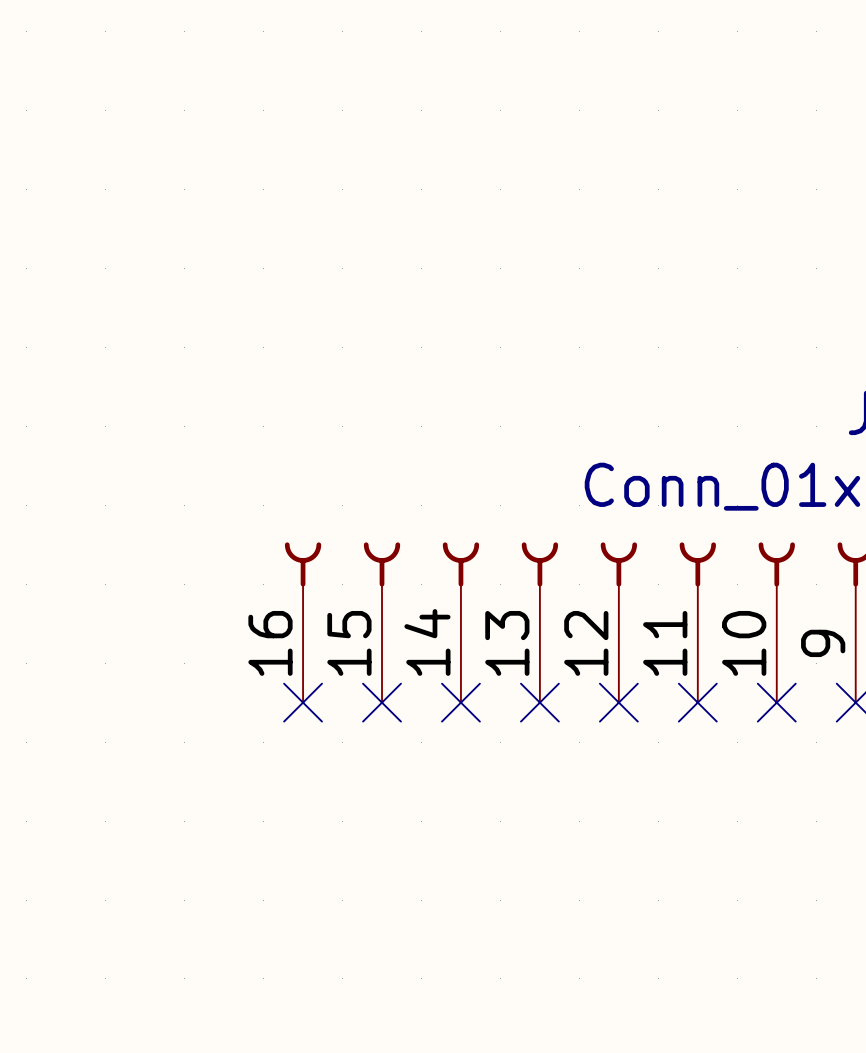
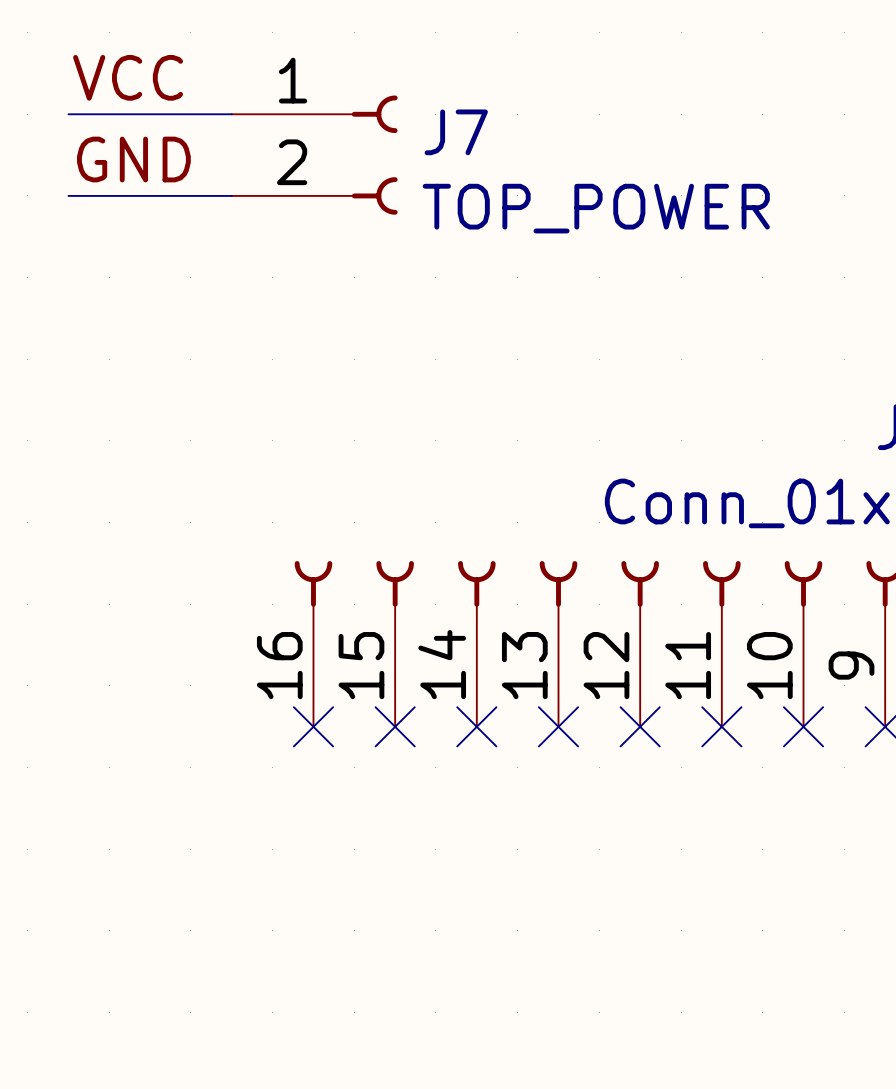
label: none -> VCC (128, 77)
wire: none -> (68, 114) (231, 114)
J7: none -> TOP_POWER (314, 155)
label: none -> GND (133, 159)
wire: none -> (68, 195) (231, 195)

